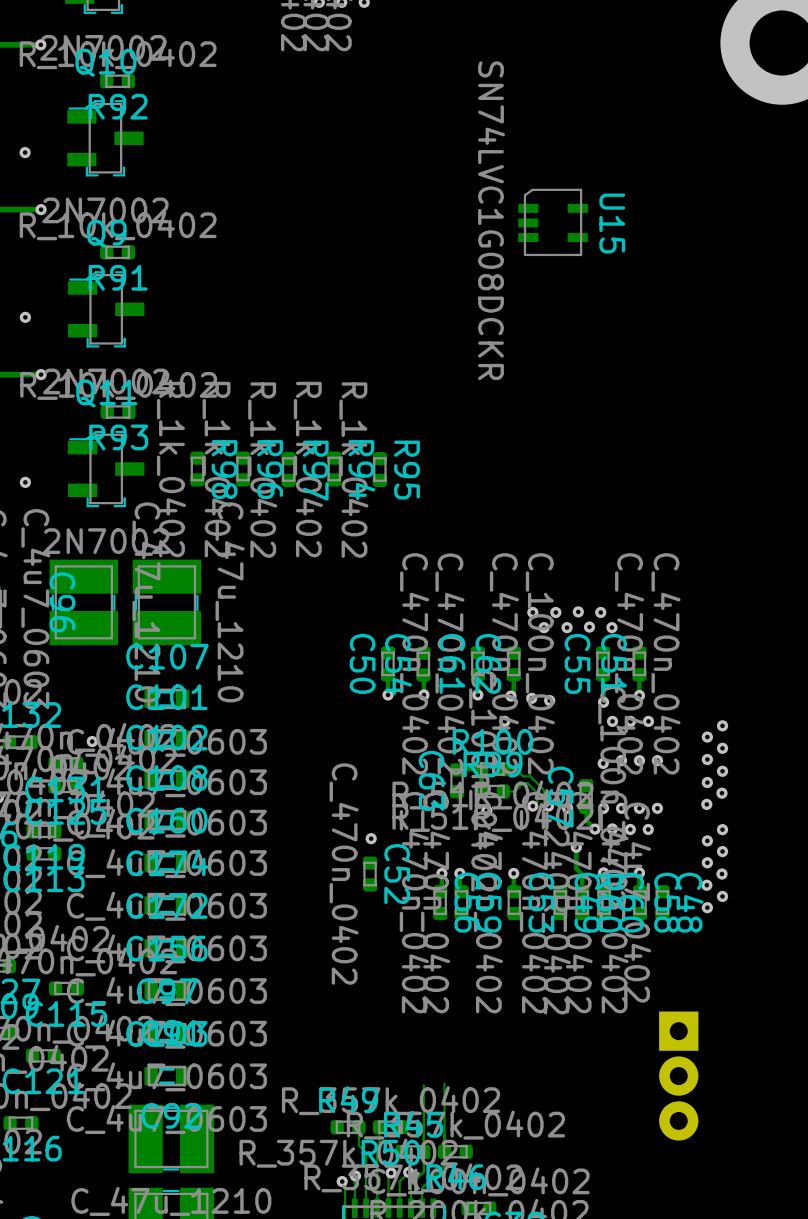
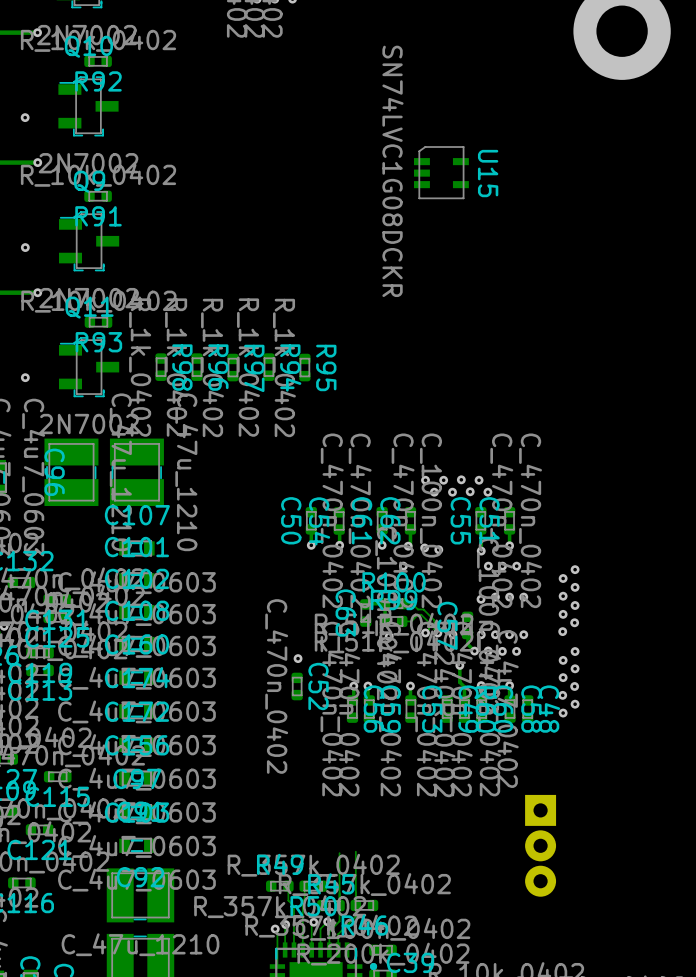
via: (92, 741) -> none

